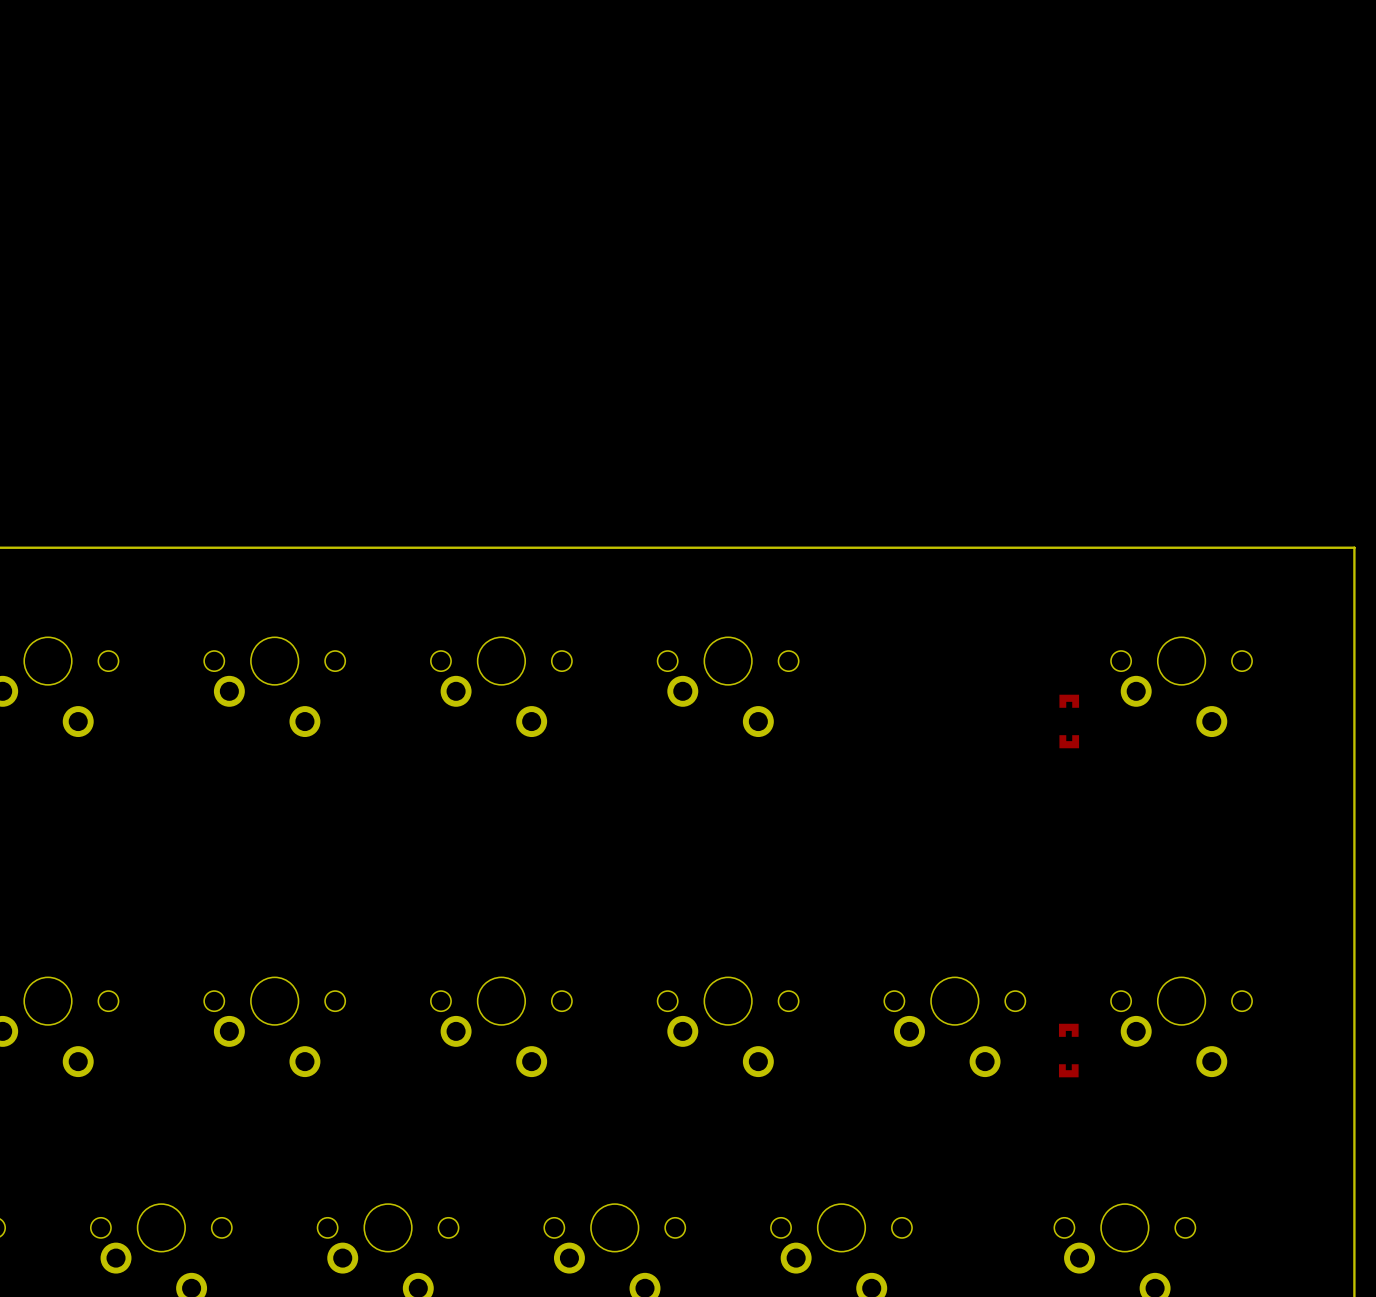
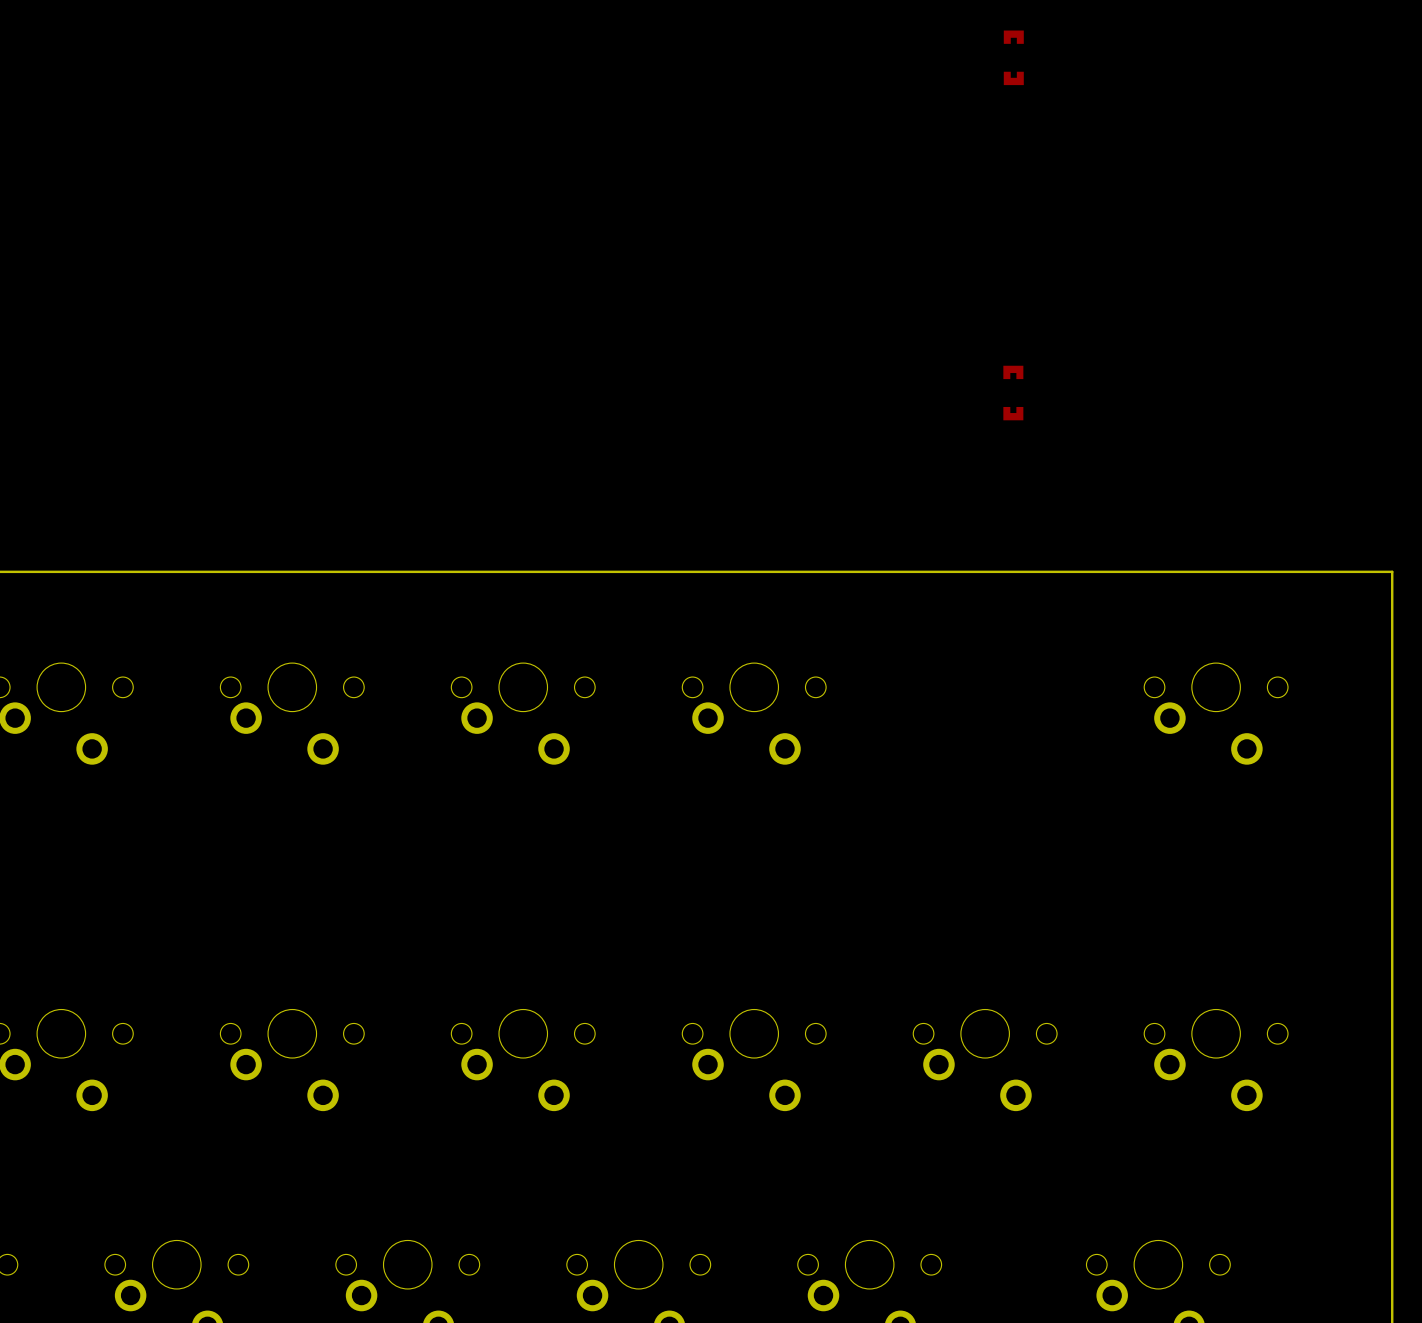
part: none -> (1013, 57)
part: none -> (1013, 393)
part: (1069, 721) -> none
part: (1068, 1050) -> none

